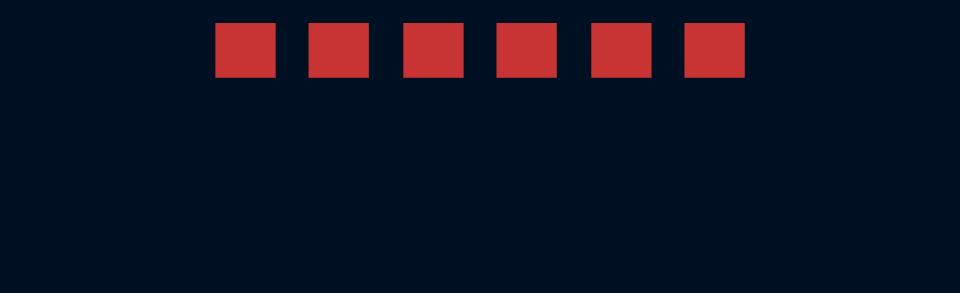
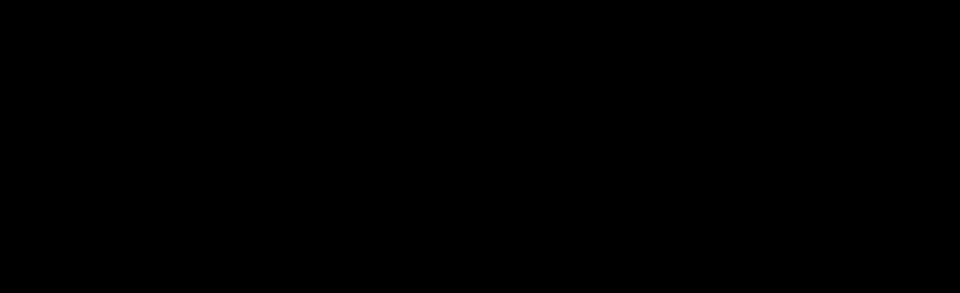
part: (292, 50) -> none
part: (480, 50) -> none
part: (668, 50) -> none

